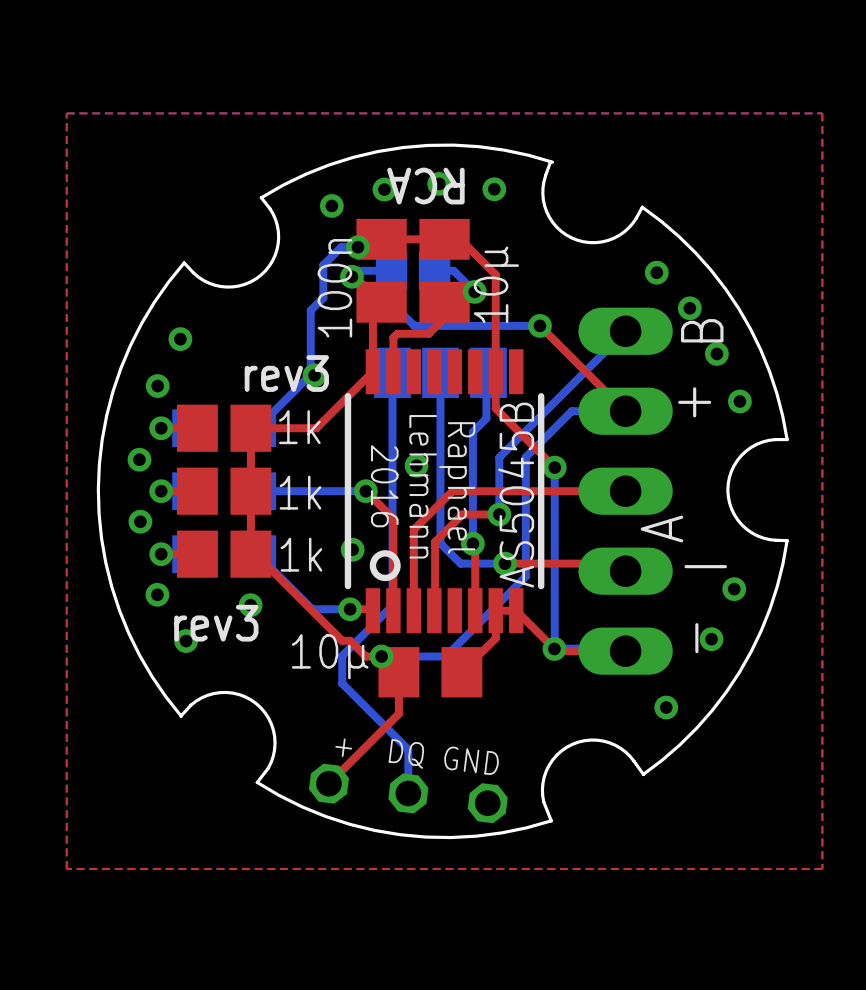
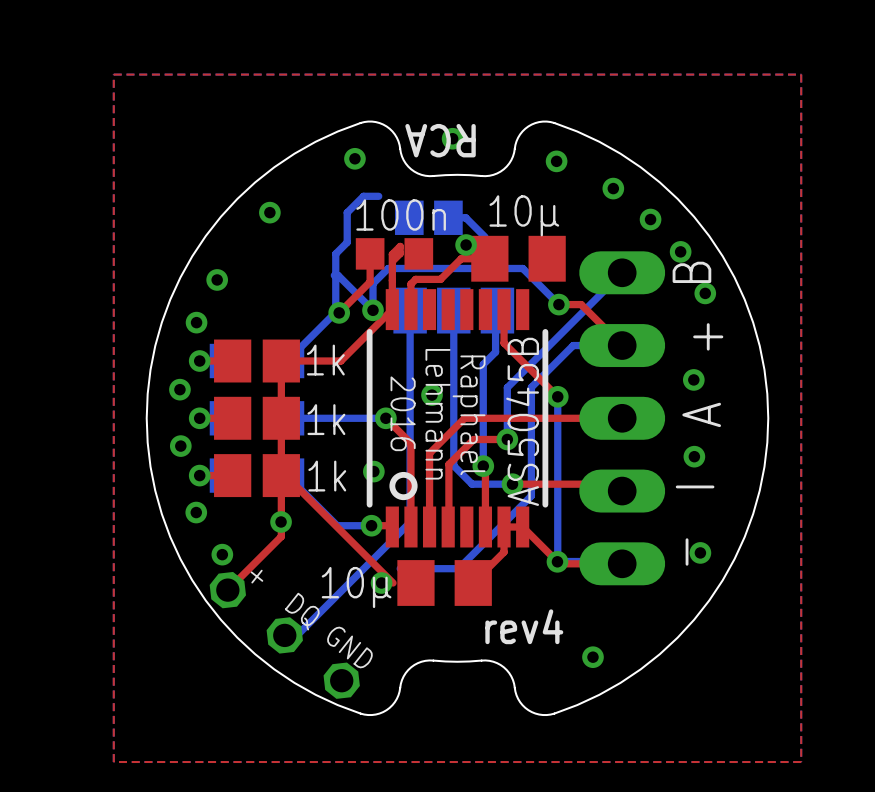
board edge: (550, 161) (545, 175) -> none
board edge: (552, 162) (503, 150) (453, 145) (428, 145) (378, 151) (329, 164) (283, 185) (261, 197) (275, 219) (278, 237) (272, 260) (260, 275) (250, 281) (239, 285) (220, 286) (203, 280) (184, 262) (154, 302) (130, 345) (112, 391) (102, 439) (98, 489) (99, 513) (105, 562) (119, 610) (139, 655) (152, 676) (181, 716) -> none
board edge: none -> (360, 123) (375, 122) (389, 128) (396, 137) (402, 156) (408, 166) (417, 173) (429, 176) (485, 176) (497, 173) (506, 166) (511, 160) (516, 141) (522, 131) (539, 122) (554, 123) (599, 141) (640, 167) (677, 198) (694, 216) (722, 256) (734, 277) (753, 322) (764, 369) (768, 418) (767, 442) (759, 490) (744, 536) (734, 559) (709, 600) (677, 637) (659, 654) (640, 669) (599, 694) (554, 713) (539, 714) (525, 707) (518, 698) (512, 680) (506, 670) (497, 663) (485, 660) (429, 660) (417, 663) (408, 670) (403, 676) (398, 695) (392, 705) (375, 714) (360, 713) (315, 694) (274, 669) (237, 637) (220, 619) (192, 580) (180, 559) (161, 514) (150, 466) (146, 418) (147, 393) (155, 345) (170, 299) (180, 277) (205, 236) (237, 198) (255, 182) (274, 167) (315, 141) (360, 123)
board edge: (545, 175) (542, 193) (546, 211) (556, 227) (571, 237) (583, 241) (595, 242) (613, 238) (628, 227) (642, 207) (678, 236) (695, 252) (725, 288) (750, 328) (769, 371) (776, 393) (787, 439) (762, 441) (746, 451) (734, 465) (728, 483) (728, 496) (731, 508) (741, 524) (751, 532) (763, 538) (787, 540) (777, 586) (761, 630) (739, 672) (712, 710) (680, 744) (643, 774) -> none
via: (384, 189) -> none
via: (494, 189) -> none
via: none -> (556, 161)
via: none -> (613, 188)
top track: (357, 247) (365, 239) (460, 239) (495, 274) (495, 371) -> none
via: (357, 247) -> none
via: none -> (269, 212)
part: 100n (381, 270) -> none
part rotation: 0° (444, 270) -> 90° clockwise (518, 258)
part position: (444, 270) -> (518, 258)
bottom track: (352, 276) (357, 270) (391, 270) (389, 272) (389, 301) (414, 325) (539, 325) -> none
via: (352, 276) -> none
part value position: 10µ (496, 284) -> 10µ (524, 215)
top track: (474, 291) (456, 310) (452, 310) (428, 333) (397, 333) (393, 337) (393, 343) -> (466, 245) (476, 245) (489, 258) (461, 258) (440, 279) (415, 279) (410, 284)
via position: (474, 291) -> (466, 245)
top track: none -> (370, 253) (370, 281) (339, 312)
part: none -> 100n (394, 253)
top track: (539, 325) (625, 411) -> (558, 304) (581, 304) (622, 345)
via position: (539, 325) -> (558, 304)
bottom track: none -> (334, 275) (338, 275) (373, 310) (373, 283) (388, 268) (522, 268) (558, 304)
via: none -> (373, 310)
text: rev3 (286, 373) -> none
via position: (739, 401) -> (693, 379)
text position: + (694, 402) -> + (708, 336)
text position: A (661, 529) -> A (701, 414)
top track: none -> (281, 475) (281, 536) (227, 590)
via position: (734, 589) -> (694, 456)
text: rev3 (216, 623) -> none
top track: (342, 640) (350, 640) (365, 656) (383, 656) (398, 672) (398, 713) (328, 783) -> (364, 554) (393, 583)
bottom track: (342, 655) (342, 683) (408, 749) (408, 793) -> (364, 568) (297, 635) (284, 635)
part value position: 10µ (330, 656) -> 10µ (356, 587)
via position: (381, 656) -> (381, 583)
board edge: (191, 704) (181, 716) -> none
board edge: (190, 705) (201, 697) (220, 692) (233, 693) (251, 699) (261, 708) (268, 718) (274, 737) (274, 749) (271, 762) (257, 782) (302, 806) (325, 816) (374, 830) (399, 834) (425, 837) (476, 836) (526, 827) (551, 820) (542, 795) (544, 776) (549, 765) (556, 755) (566, 747) (578, 742) (596, 740) (615, 745) (630, 756) (643, 774) -> none
via position: (666, 707) -> (592, 657)
text: none -> rev4 (524, 626)
part: none -> (284, 635)
text rotation: 0° (417, 756) -> 31.5° clockwise (311, 619)
part: (408, 793) -> none

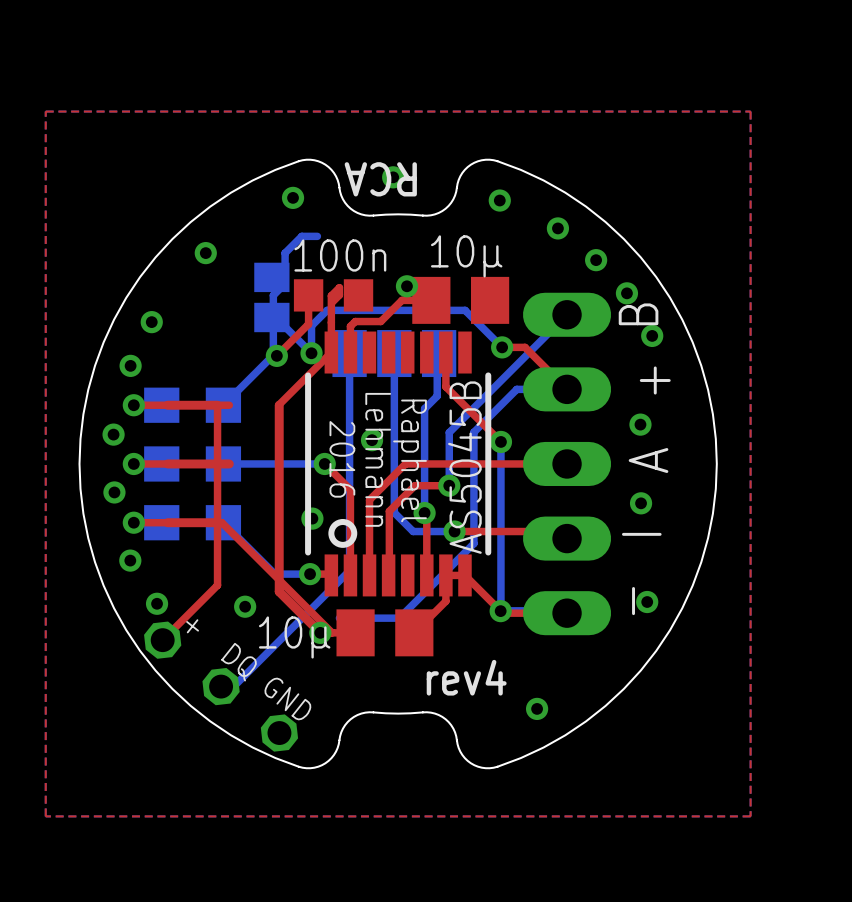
part rotation: 0° (428, 217) -> 90° clockwise (271, 297)
part position: (428, 217) -> (271, 297)
bottom track: (448, 223) (448, 217) (465, 217) (484, 236) -> none
top track: none -> (167, 405) (217, 405)
part: 1k (256, 361) -> none
top track: (292, 361) (340, 361) -> (355, 632) (320, 632) (279, 591) (279, 405)
top track: none -> (167, 463) (229, 463)
part: 1k (256, 418) -> none
top track: none -> (167, 522) (217, 522)
part: 1k (256, 475) -> none
via position: (281, 521) -> (245, 606)

